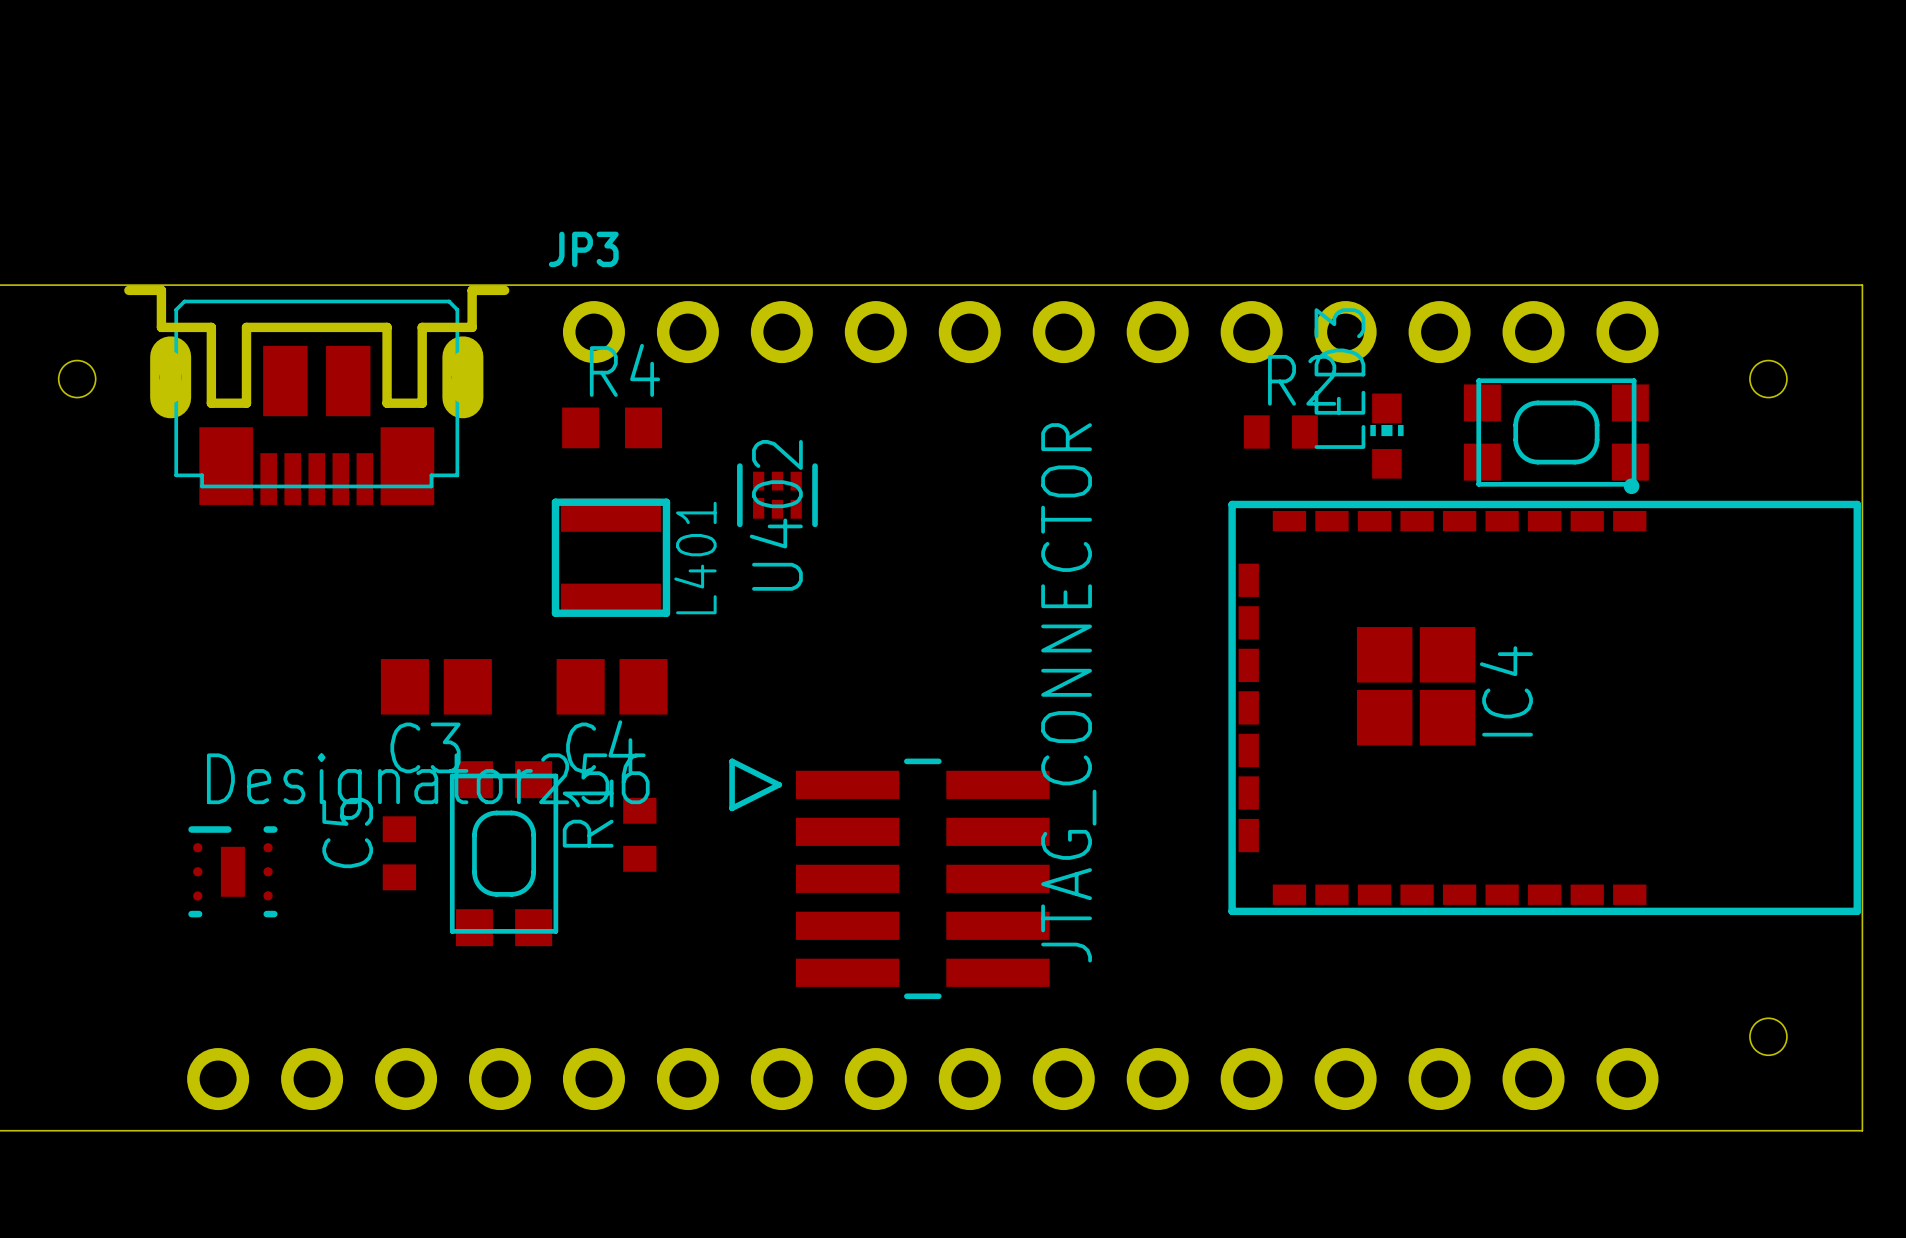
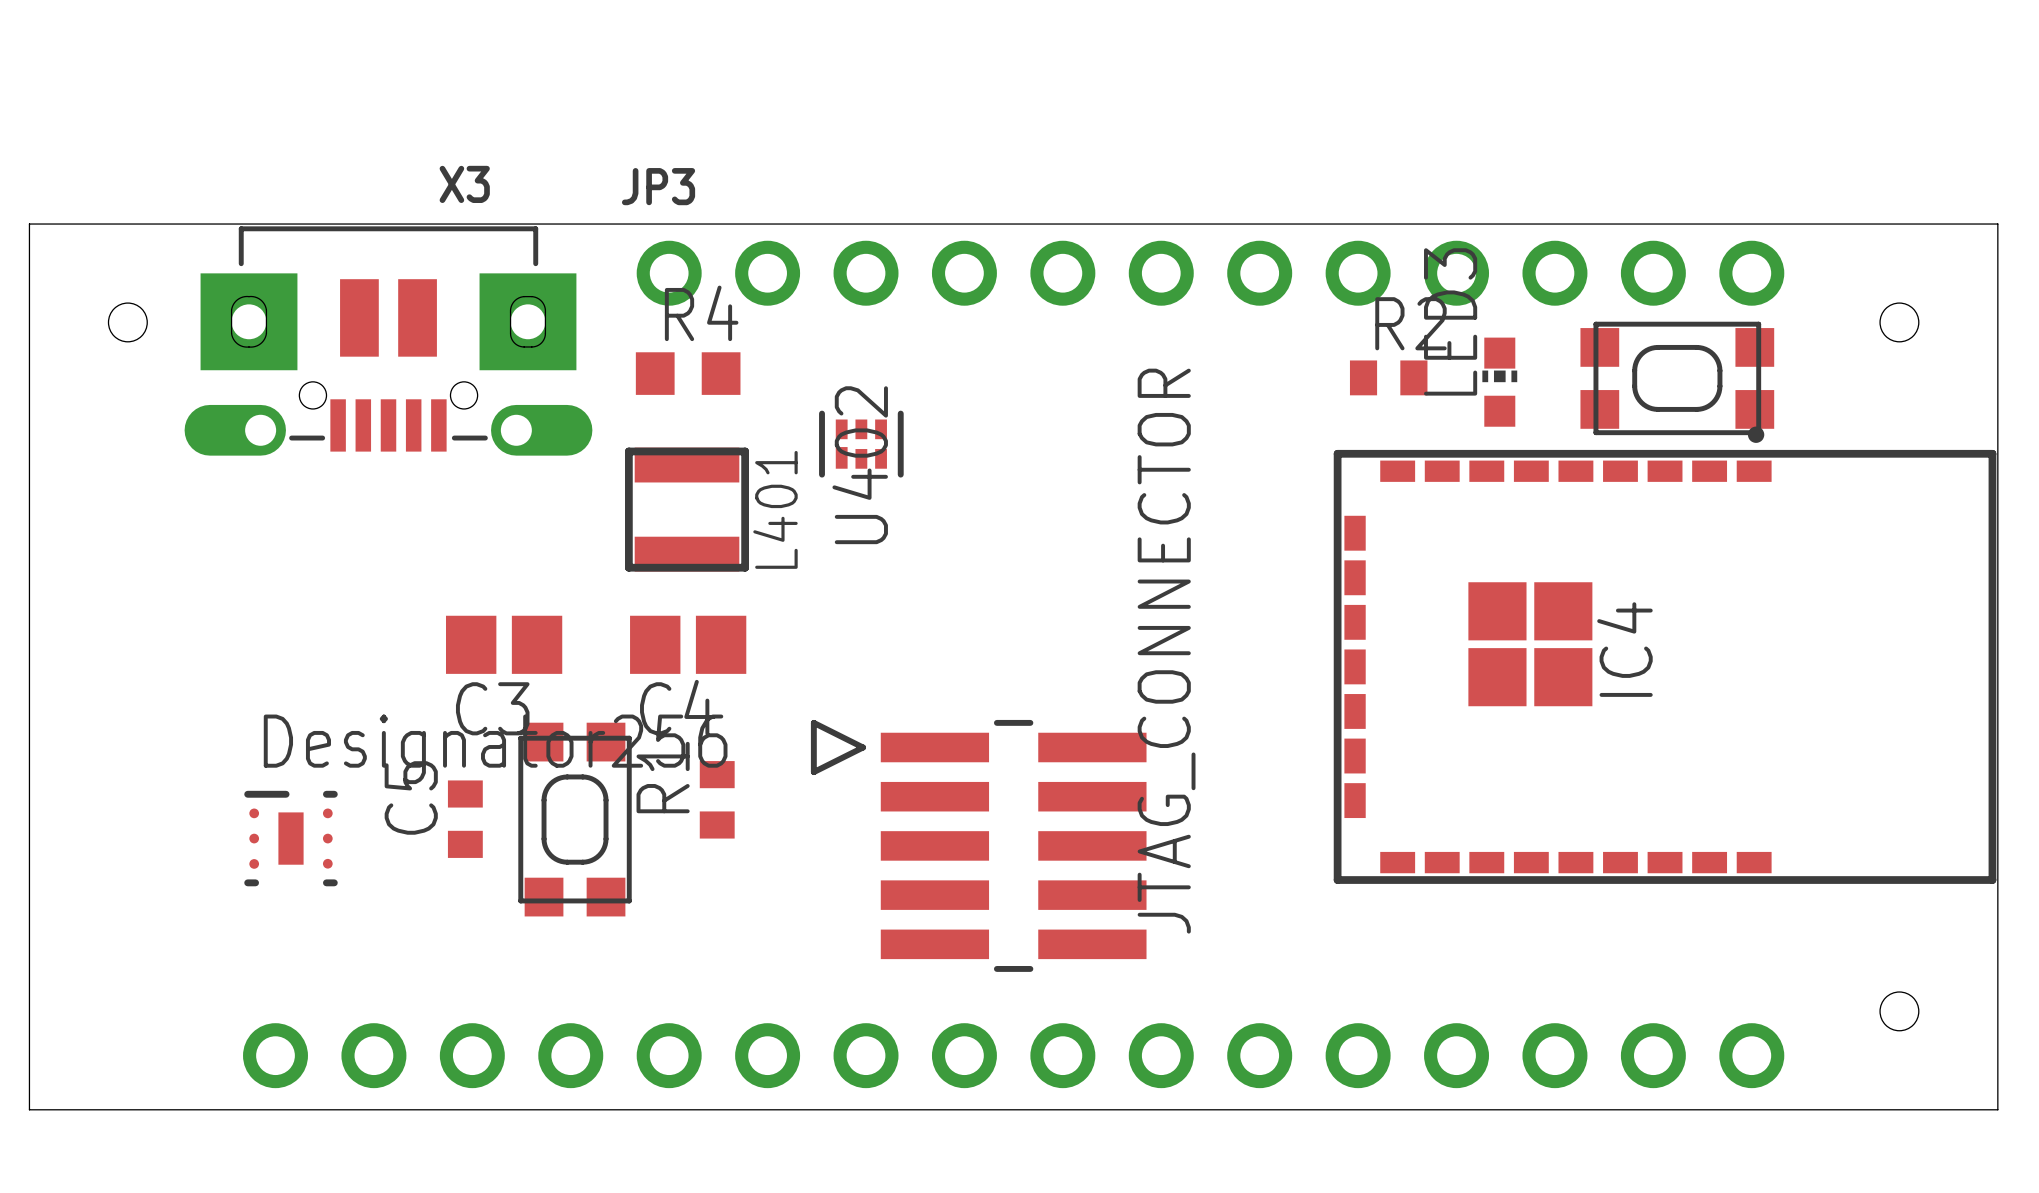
part: (316, 395) -> none
X3: none -> (388, 340)

